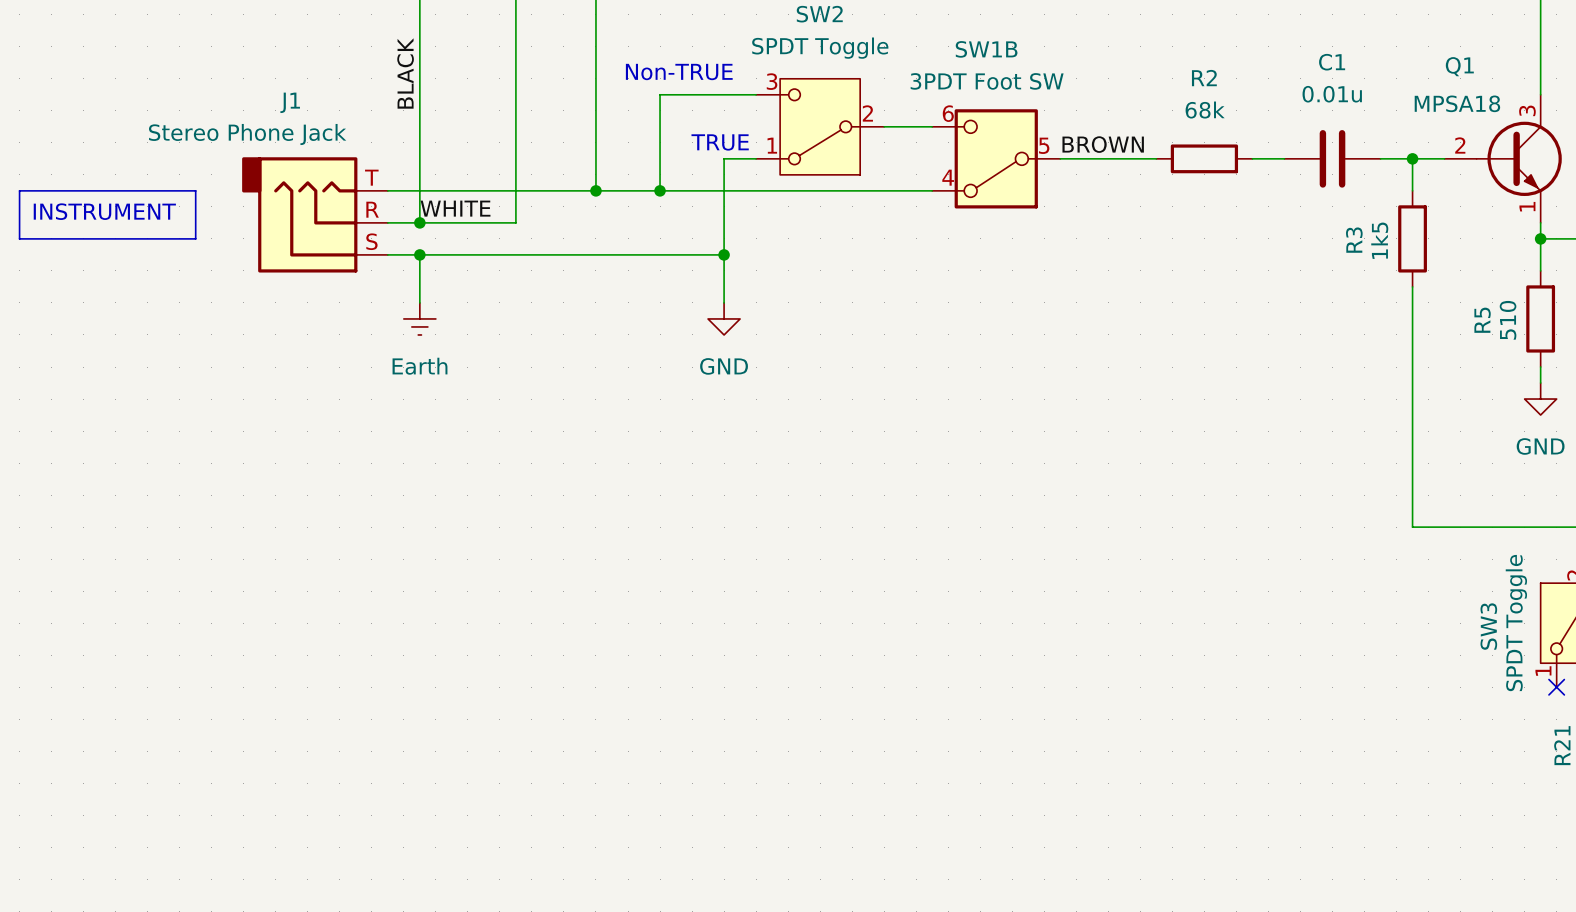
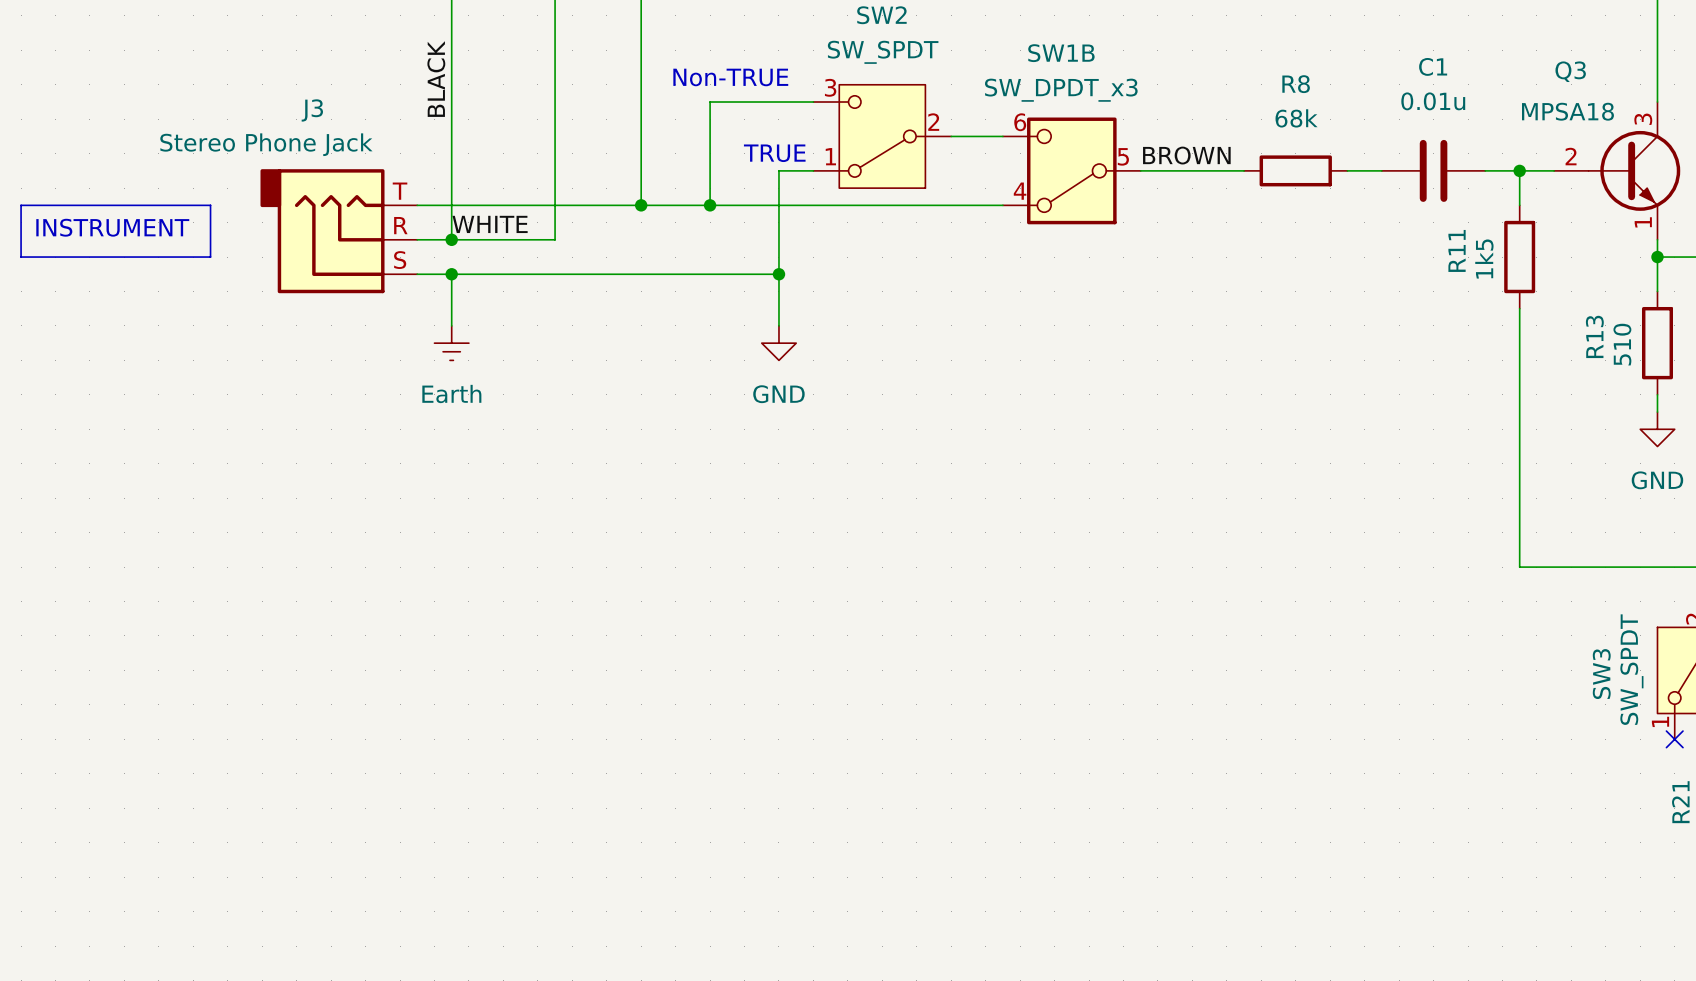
SW2 value: SPDT Toggle (820, 48) -> SW_SPDT (883, 52)
Q1 name: Q1 (1459, 66) -> Q3 (1570, 71)
R2 name: R2 (1204, 78) -> R8 (1296, 84)
SW1B value: 3PDT Foot SW (987, 81) -> SW_DPDT_x3 (1061, 90)
J1 name: J1 (290, 102) -> J3 (312, 110)
R3 name: R3 (1354, 240) -> R11 (1457, 250)
R5 name: R5 (1482, 320) -> R13 (1594, 336)
SW3 value: SPDT Toggle (1516, 623) -> SW_SPDT (1631, 669)

